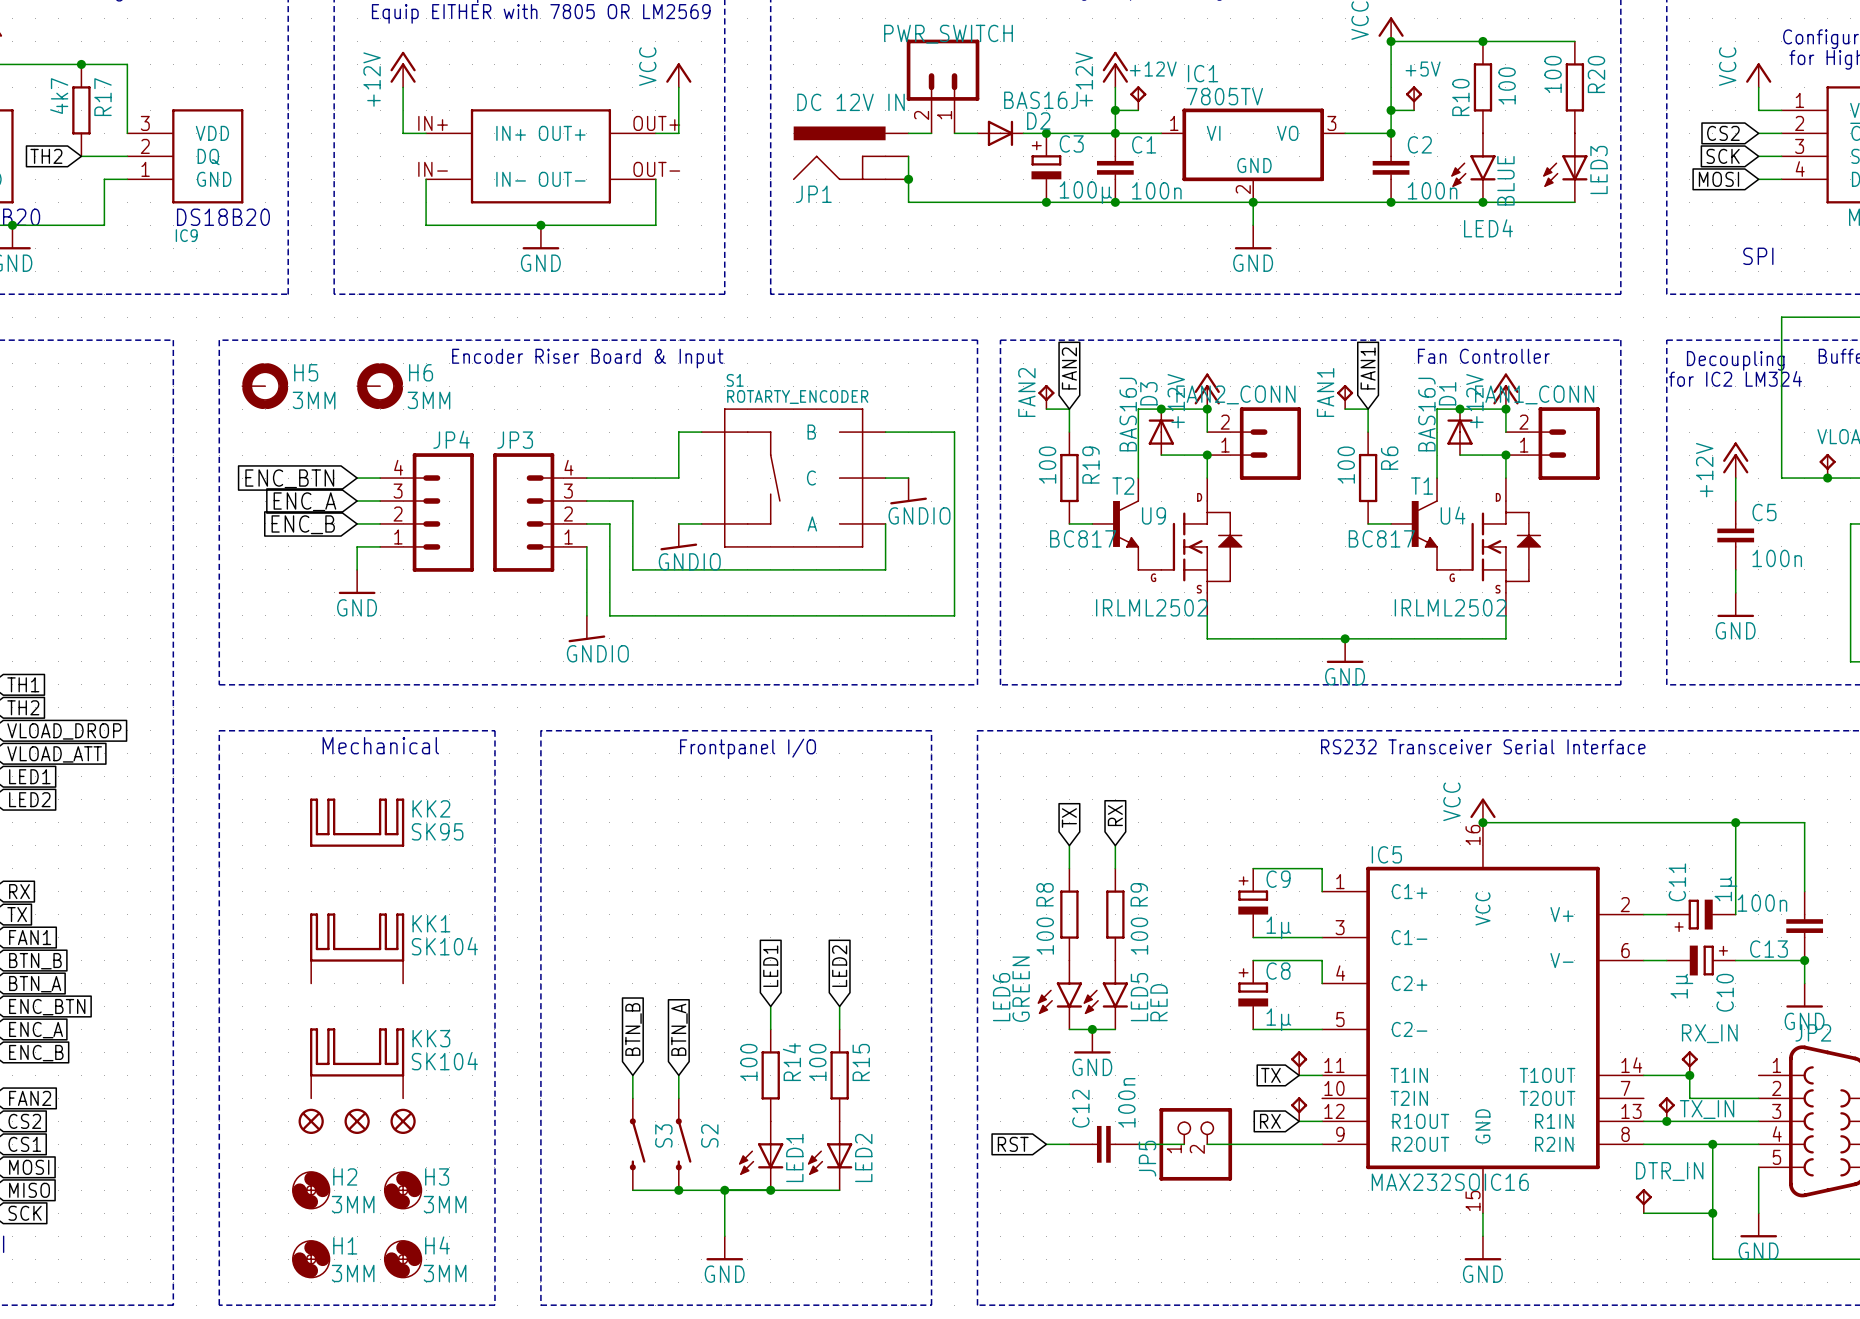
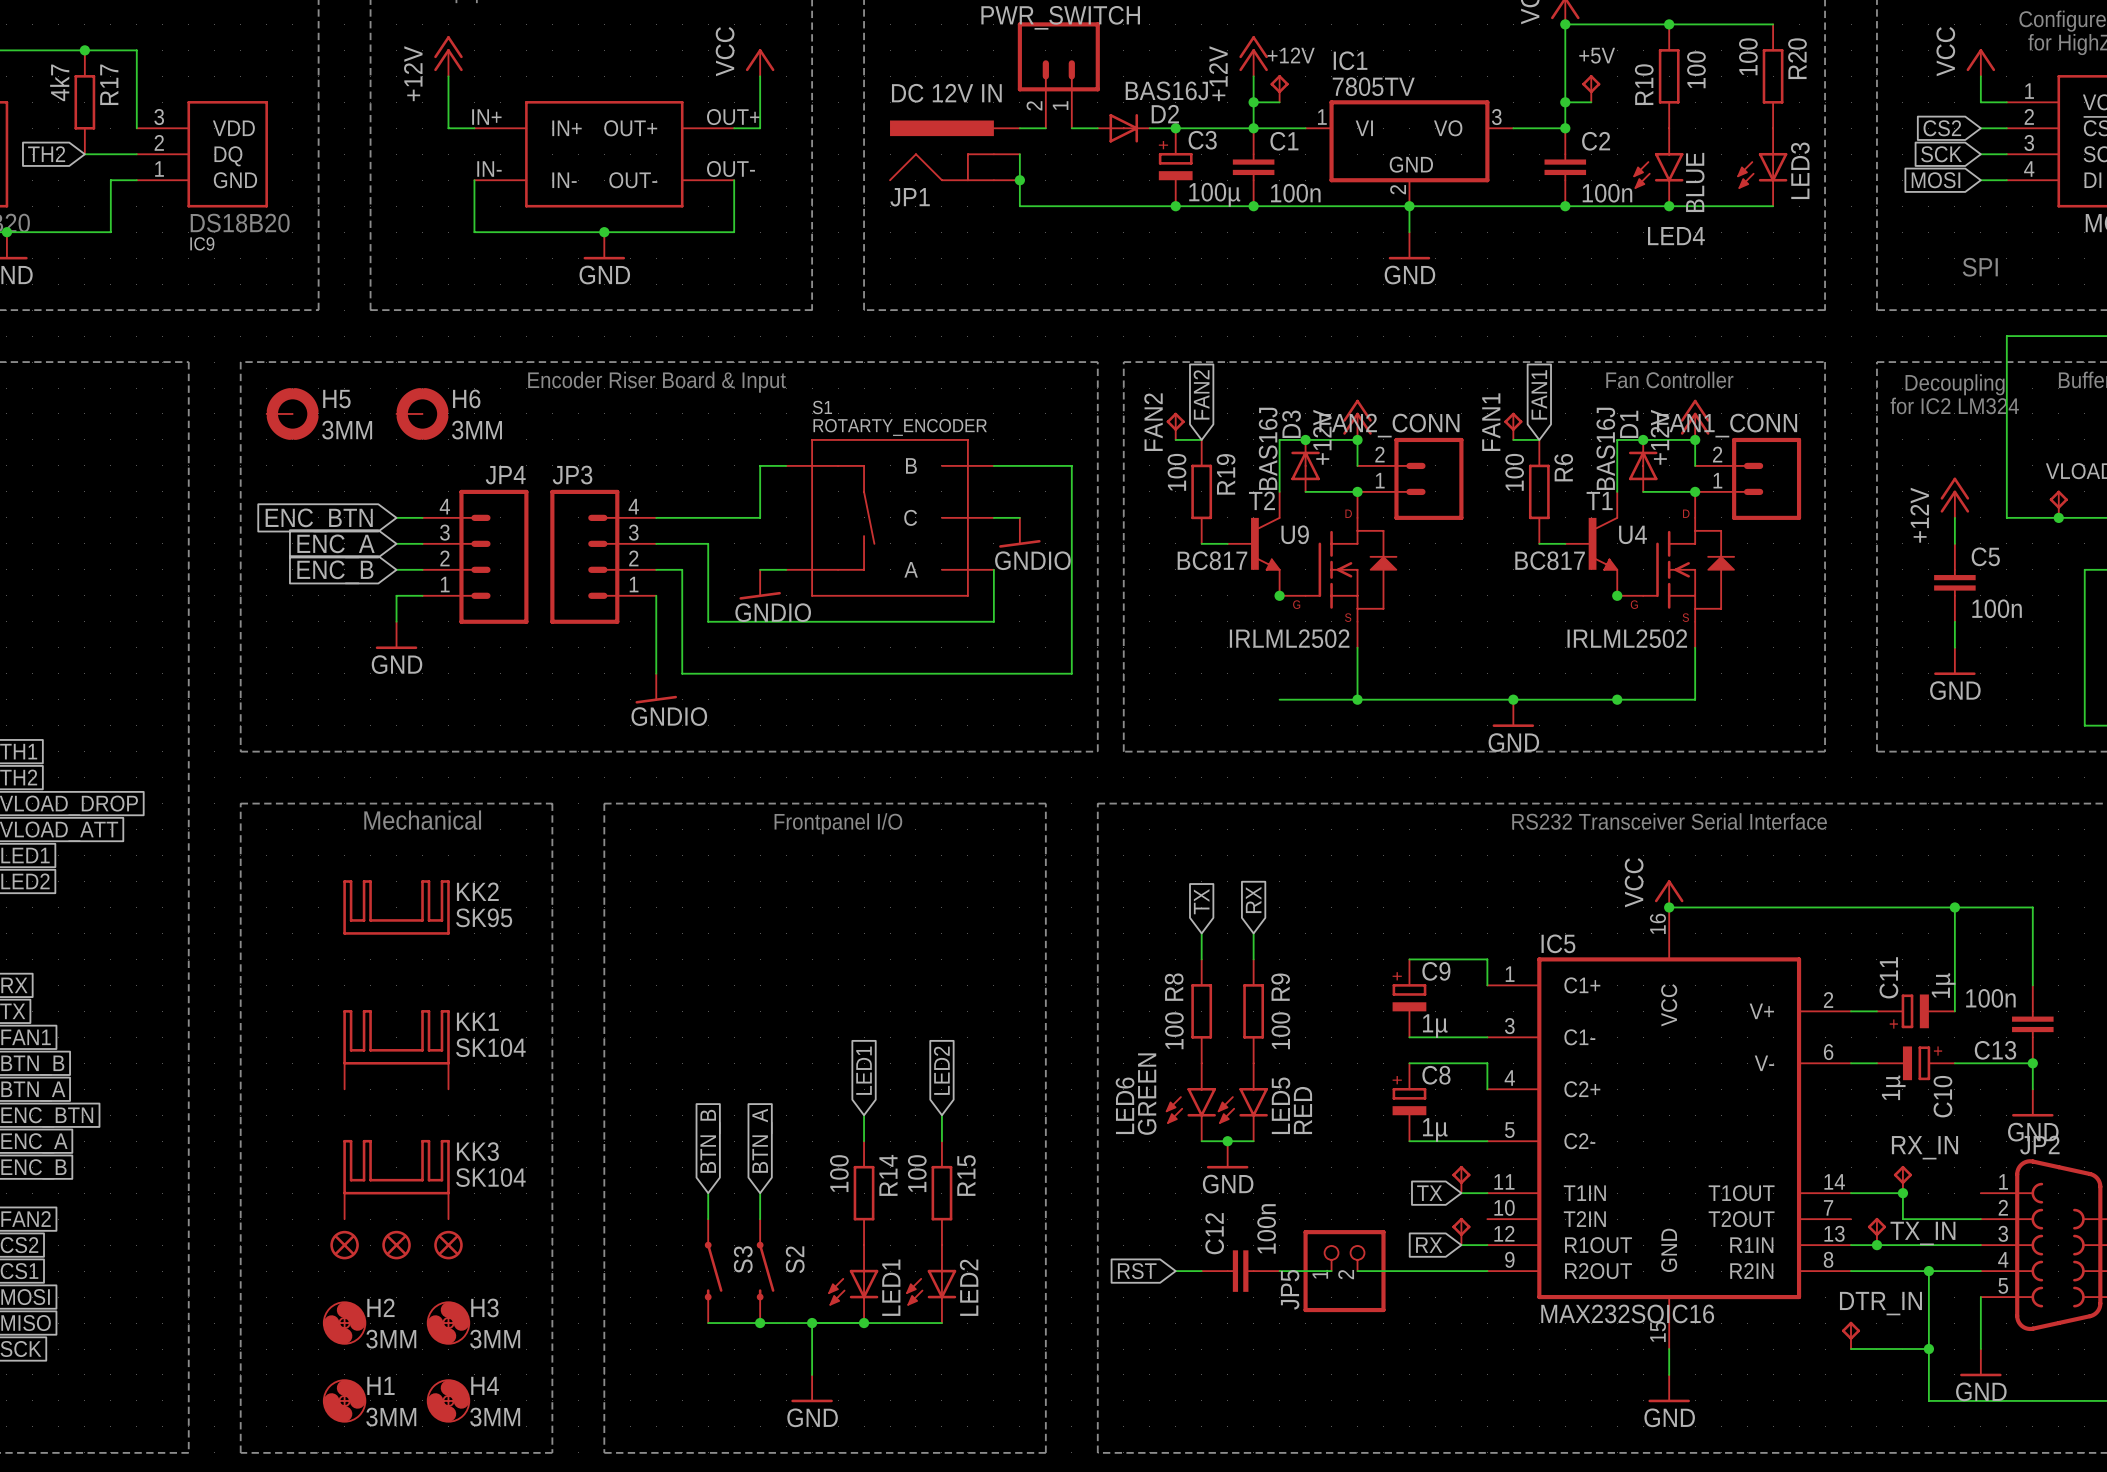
R19 position: (1069, 478) -> (1201, 491)
R6 position: (1368, 478) -> (1539, 491)
wire: (1069, 523) (1092, 523) -> (1201, 543) (1227, 543)
T2 position: (1115, 523) -> (1254, 543)
wire: (1368, 523) (1391, 523) -> (1539, 543) (1565, 543)
T1 position: (1414, 523) -> (1591, 543)
junction: none -> (1279, 595)
U9 position: (1190, 546) -> (1338, 569)
junction: none -> (1617, 595)
U4 position: (1489, 546) -> (1676, 569)
wire: none -> (1279, 699) (1357, 699)
junction: none -> (1357, 699)
junction: none -> (1617, 699)

